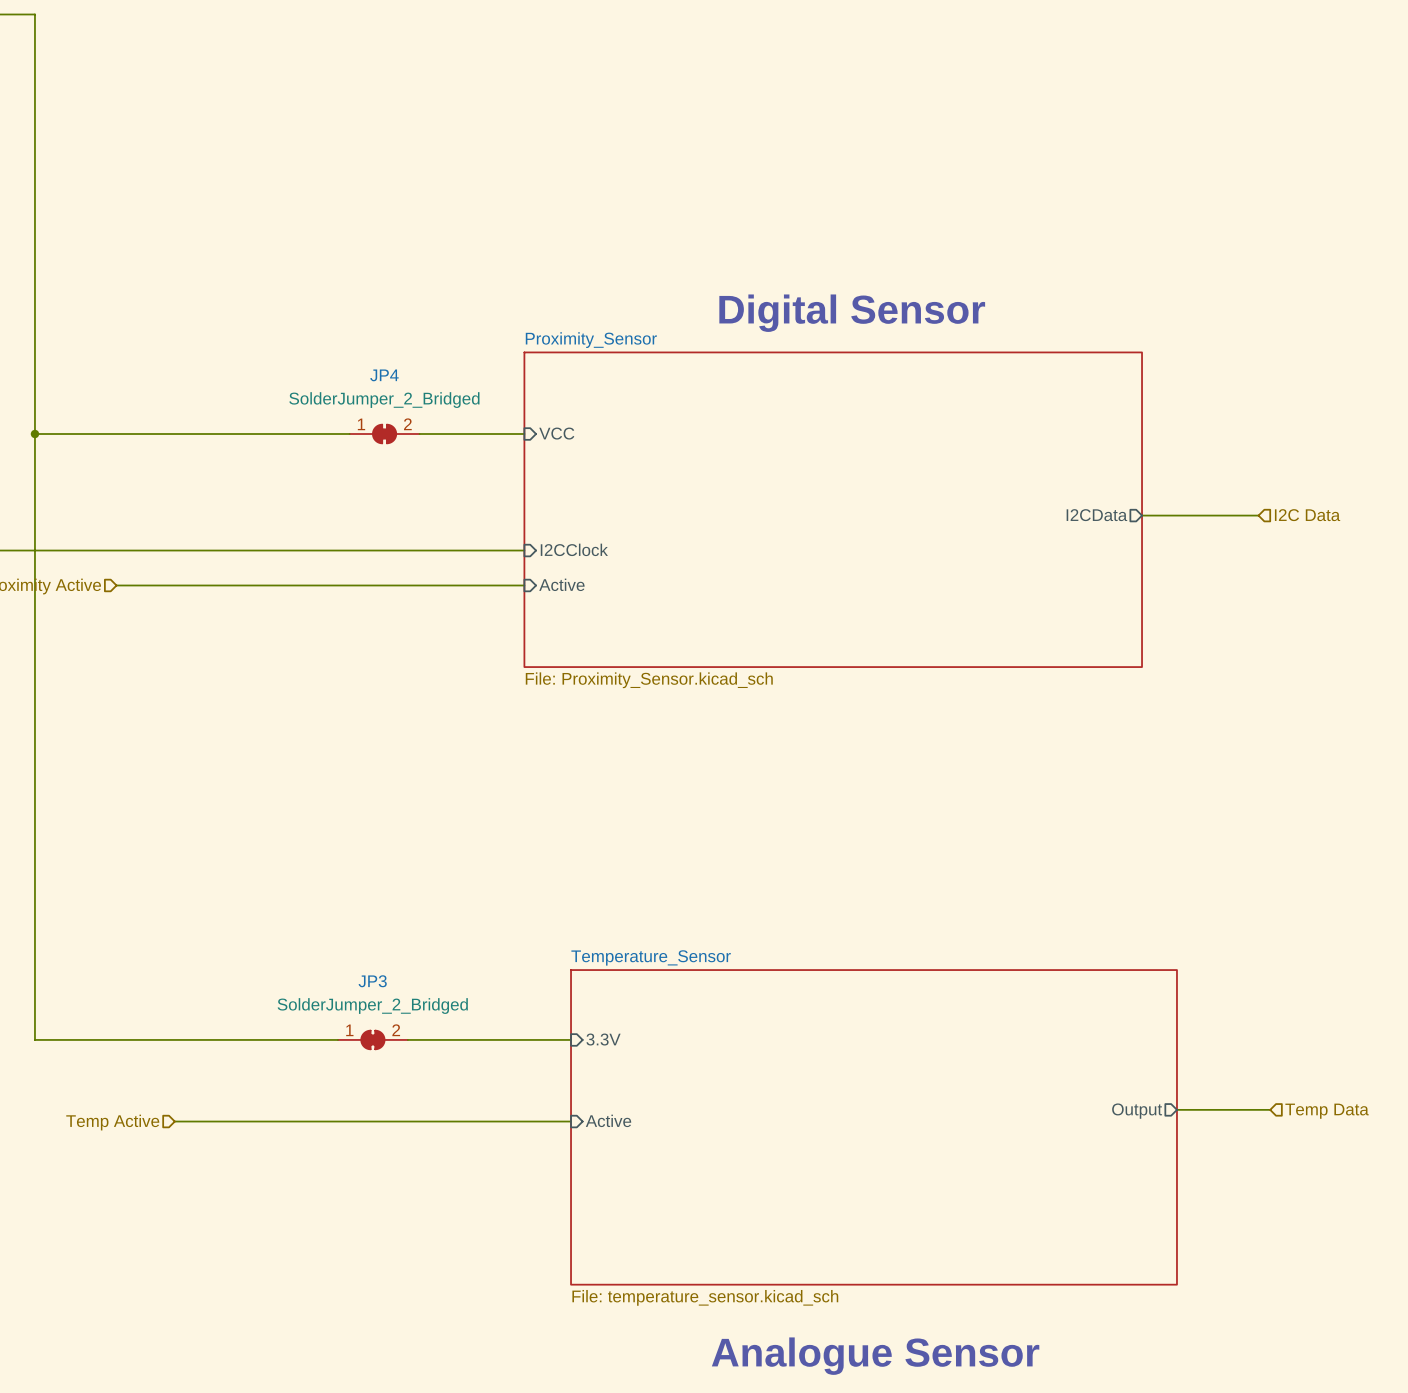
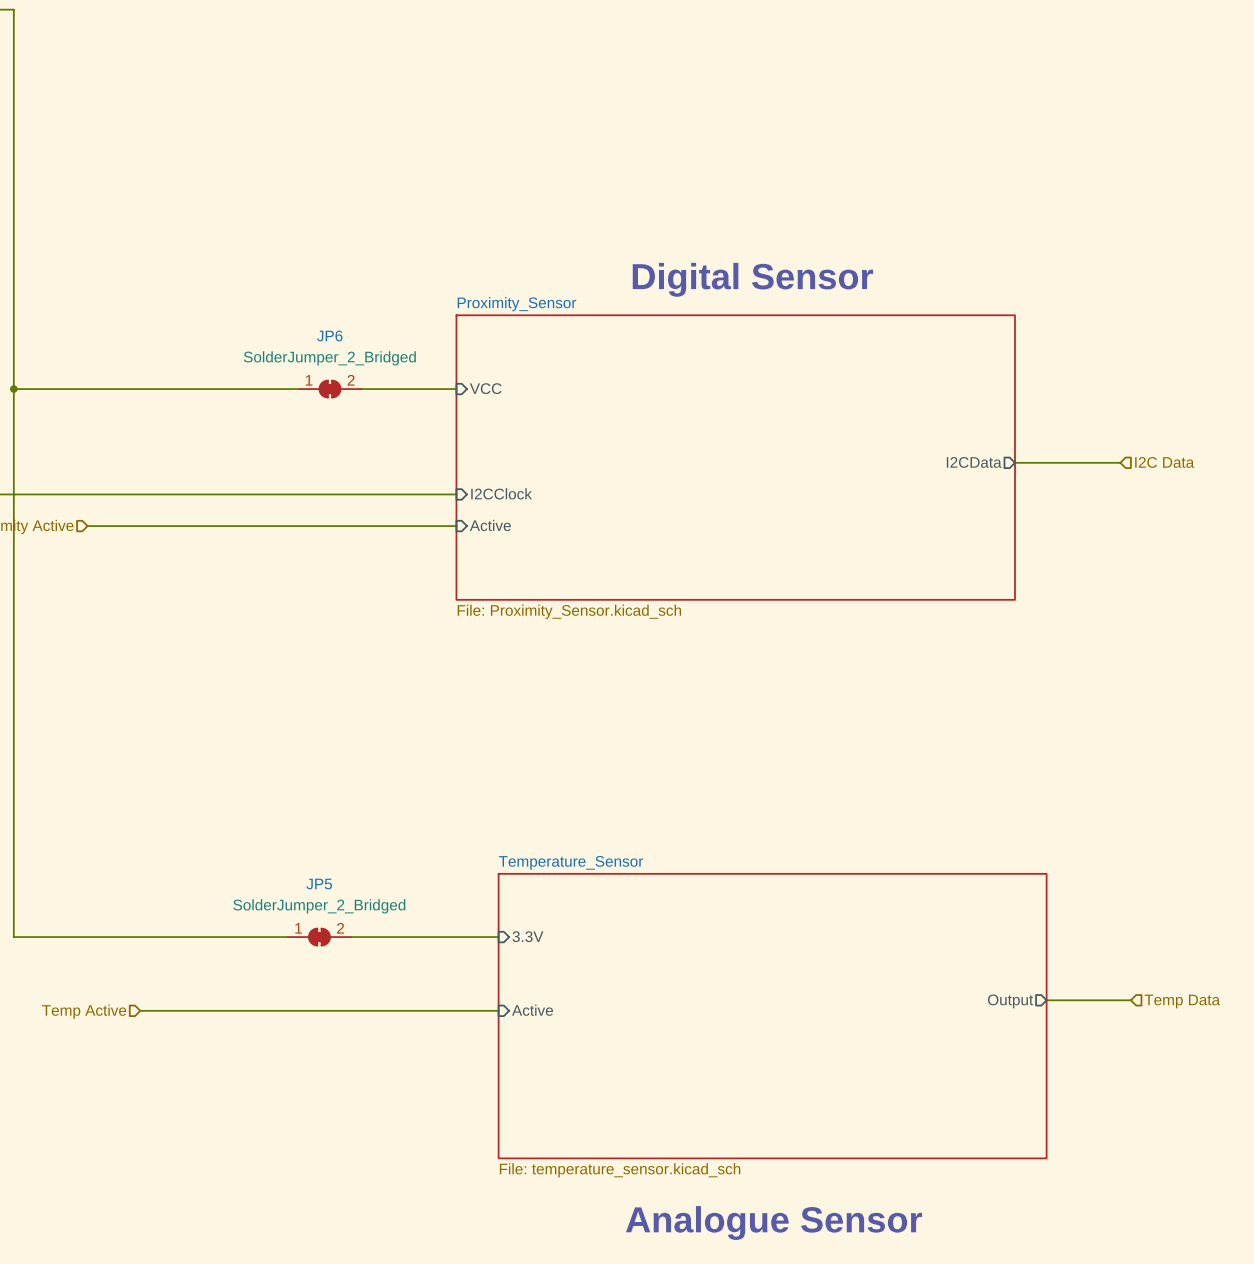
JP4 name: JP4 (384, 375) -> JP6 (329, 335)
JP3 name: JP3 (372, 981) -> JP5 (319, 884)

